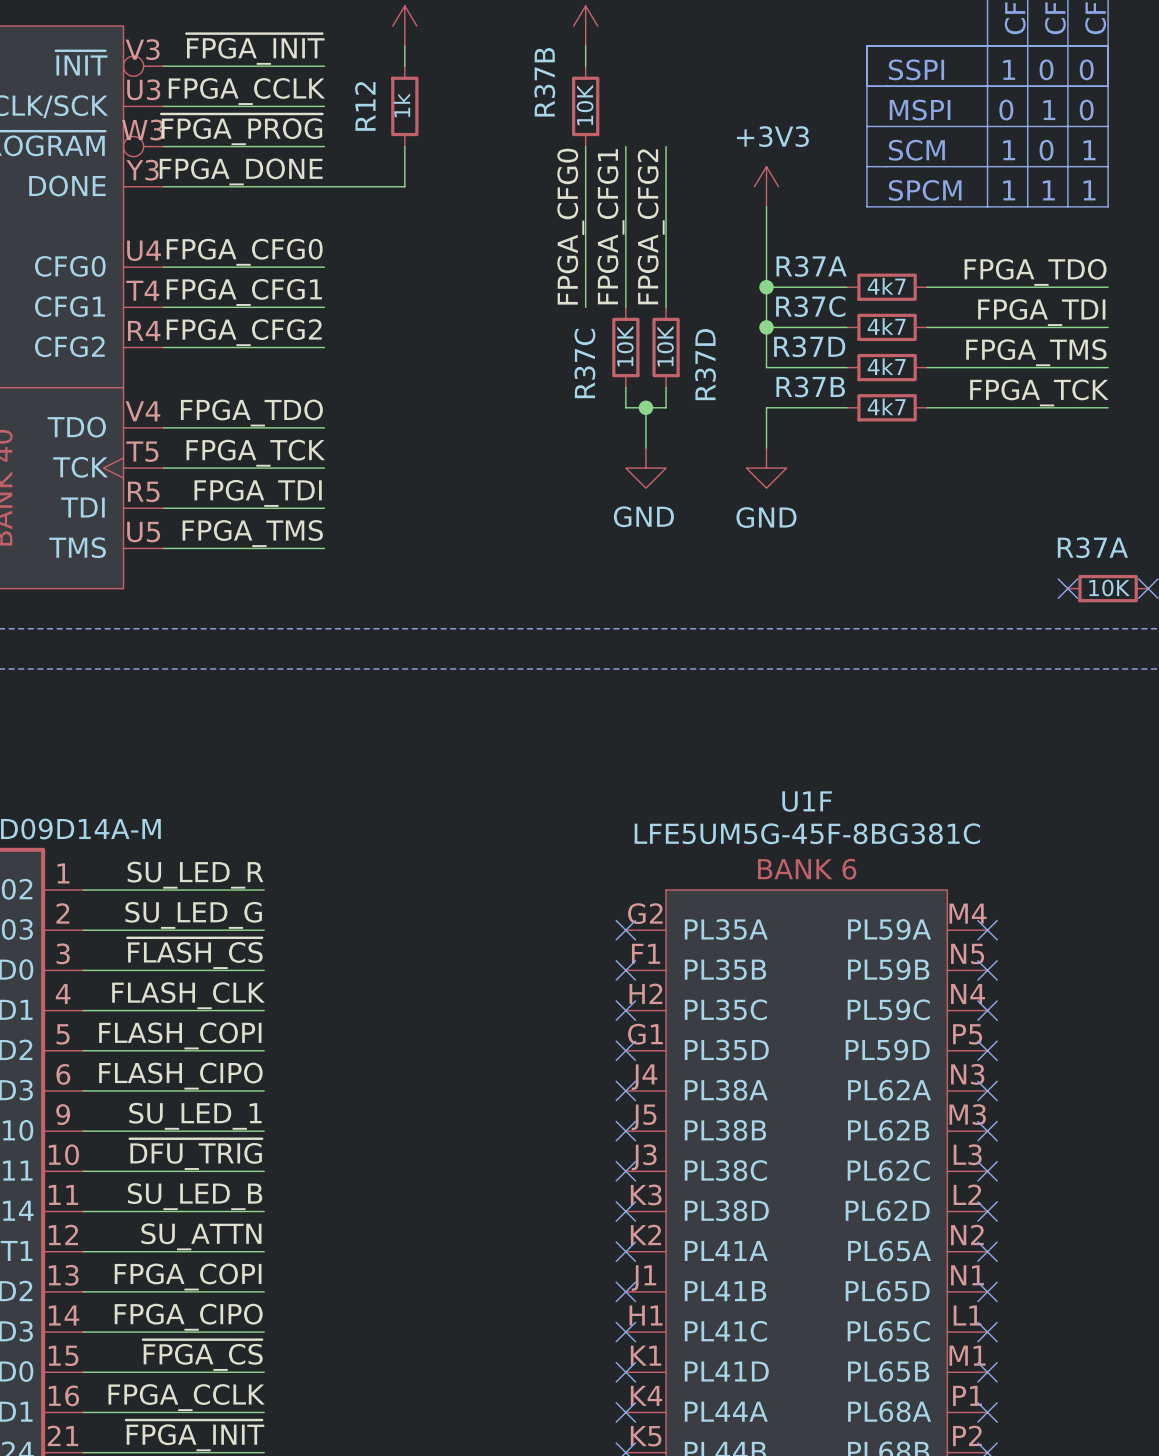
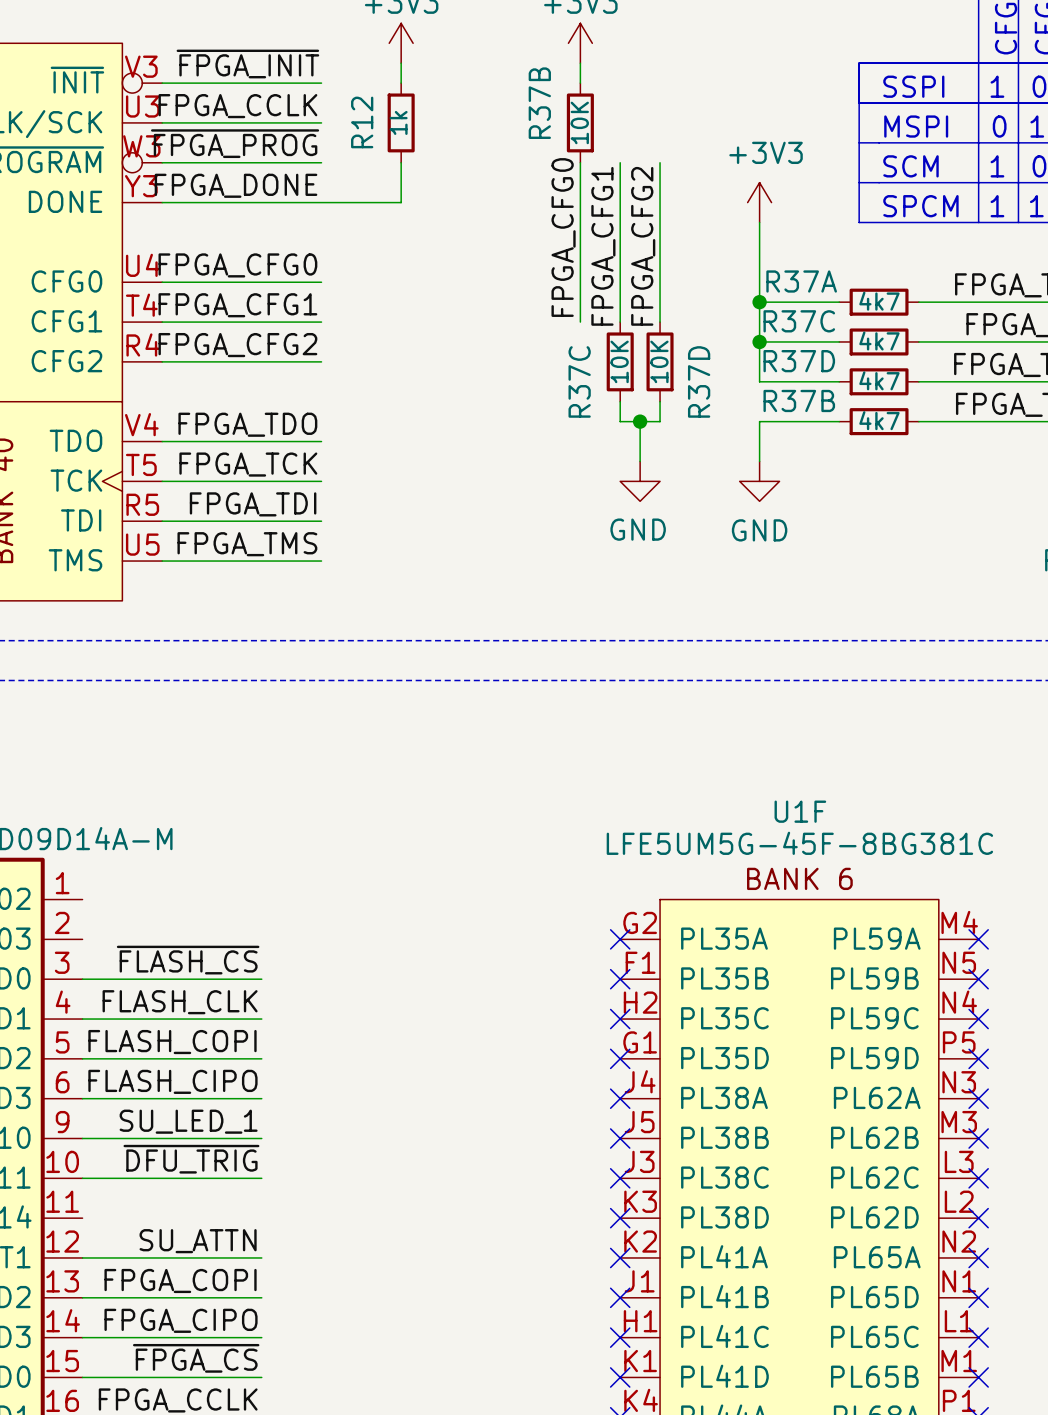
label: SU_LED_R (195, 875) -> none
wire: (83, 890) (264, 890) -> none
label: SU_LED_G (193, 915) -> none
wire: (83, 930) (264, 930) -> none
label: SU_LED_B (195, 1196) -> none
wire: (83, 1211) (264, 1211) -> none

